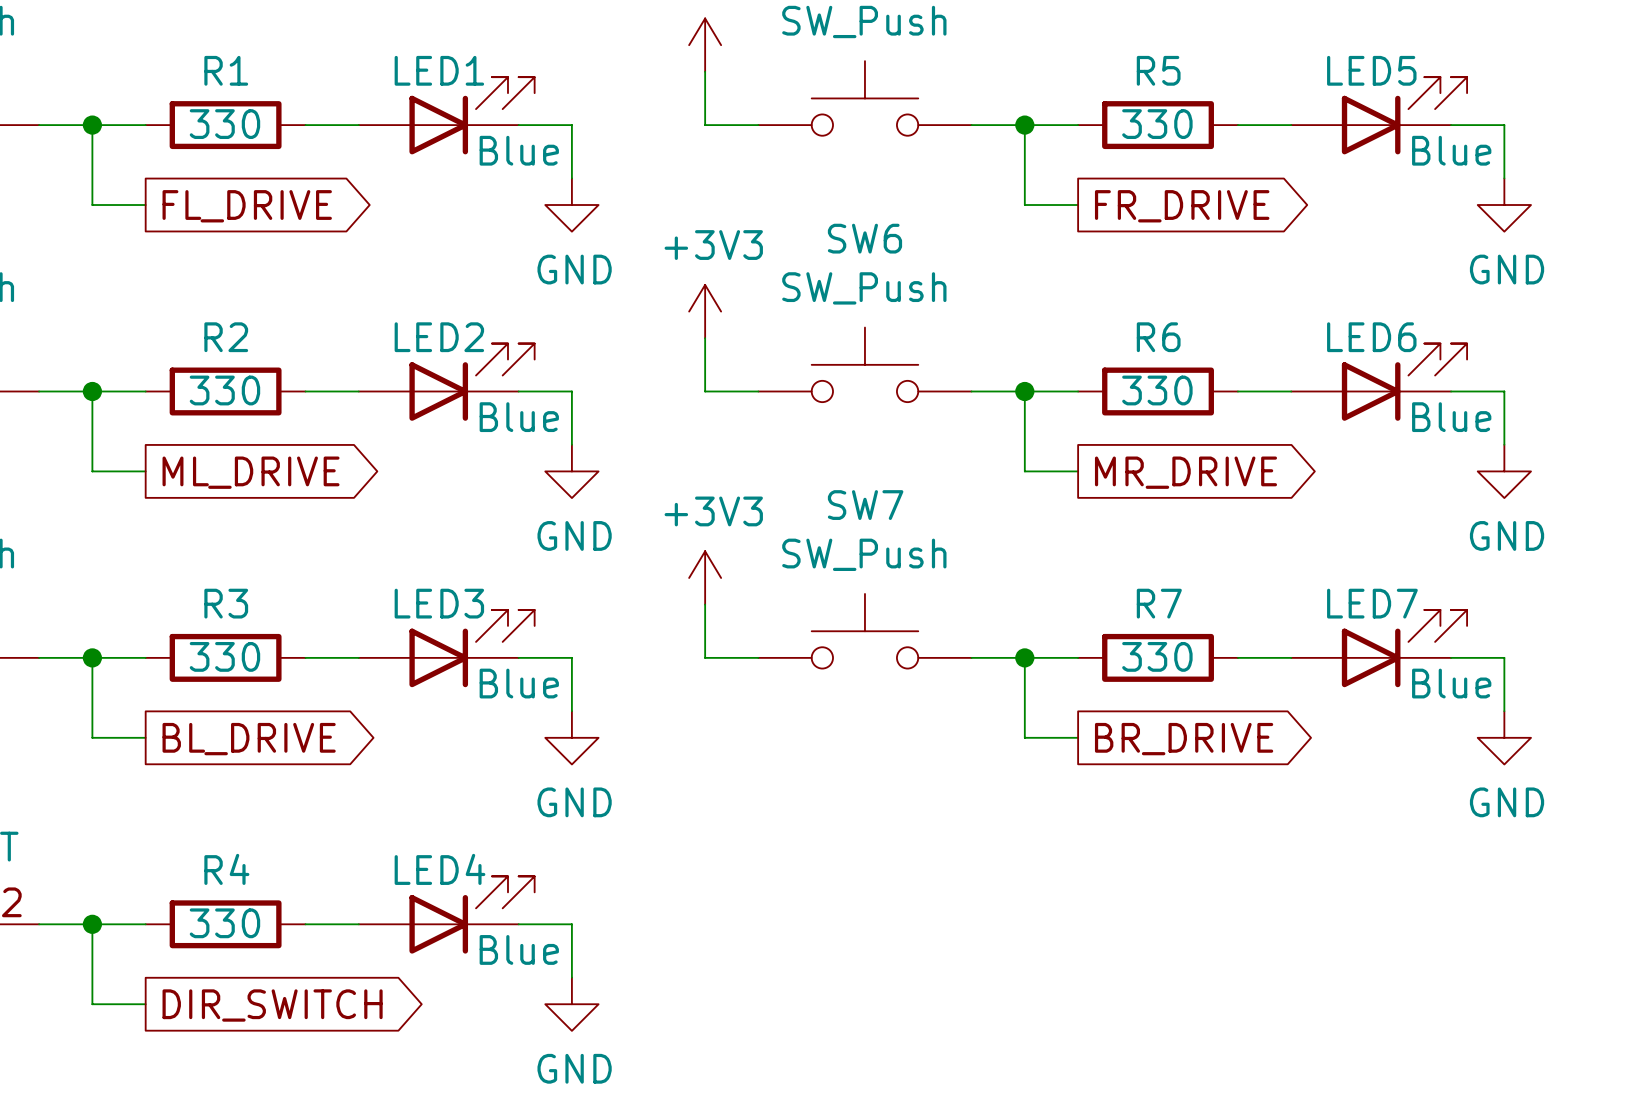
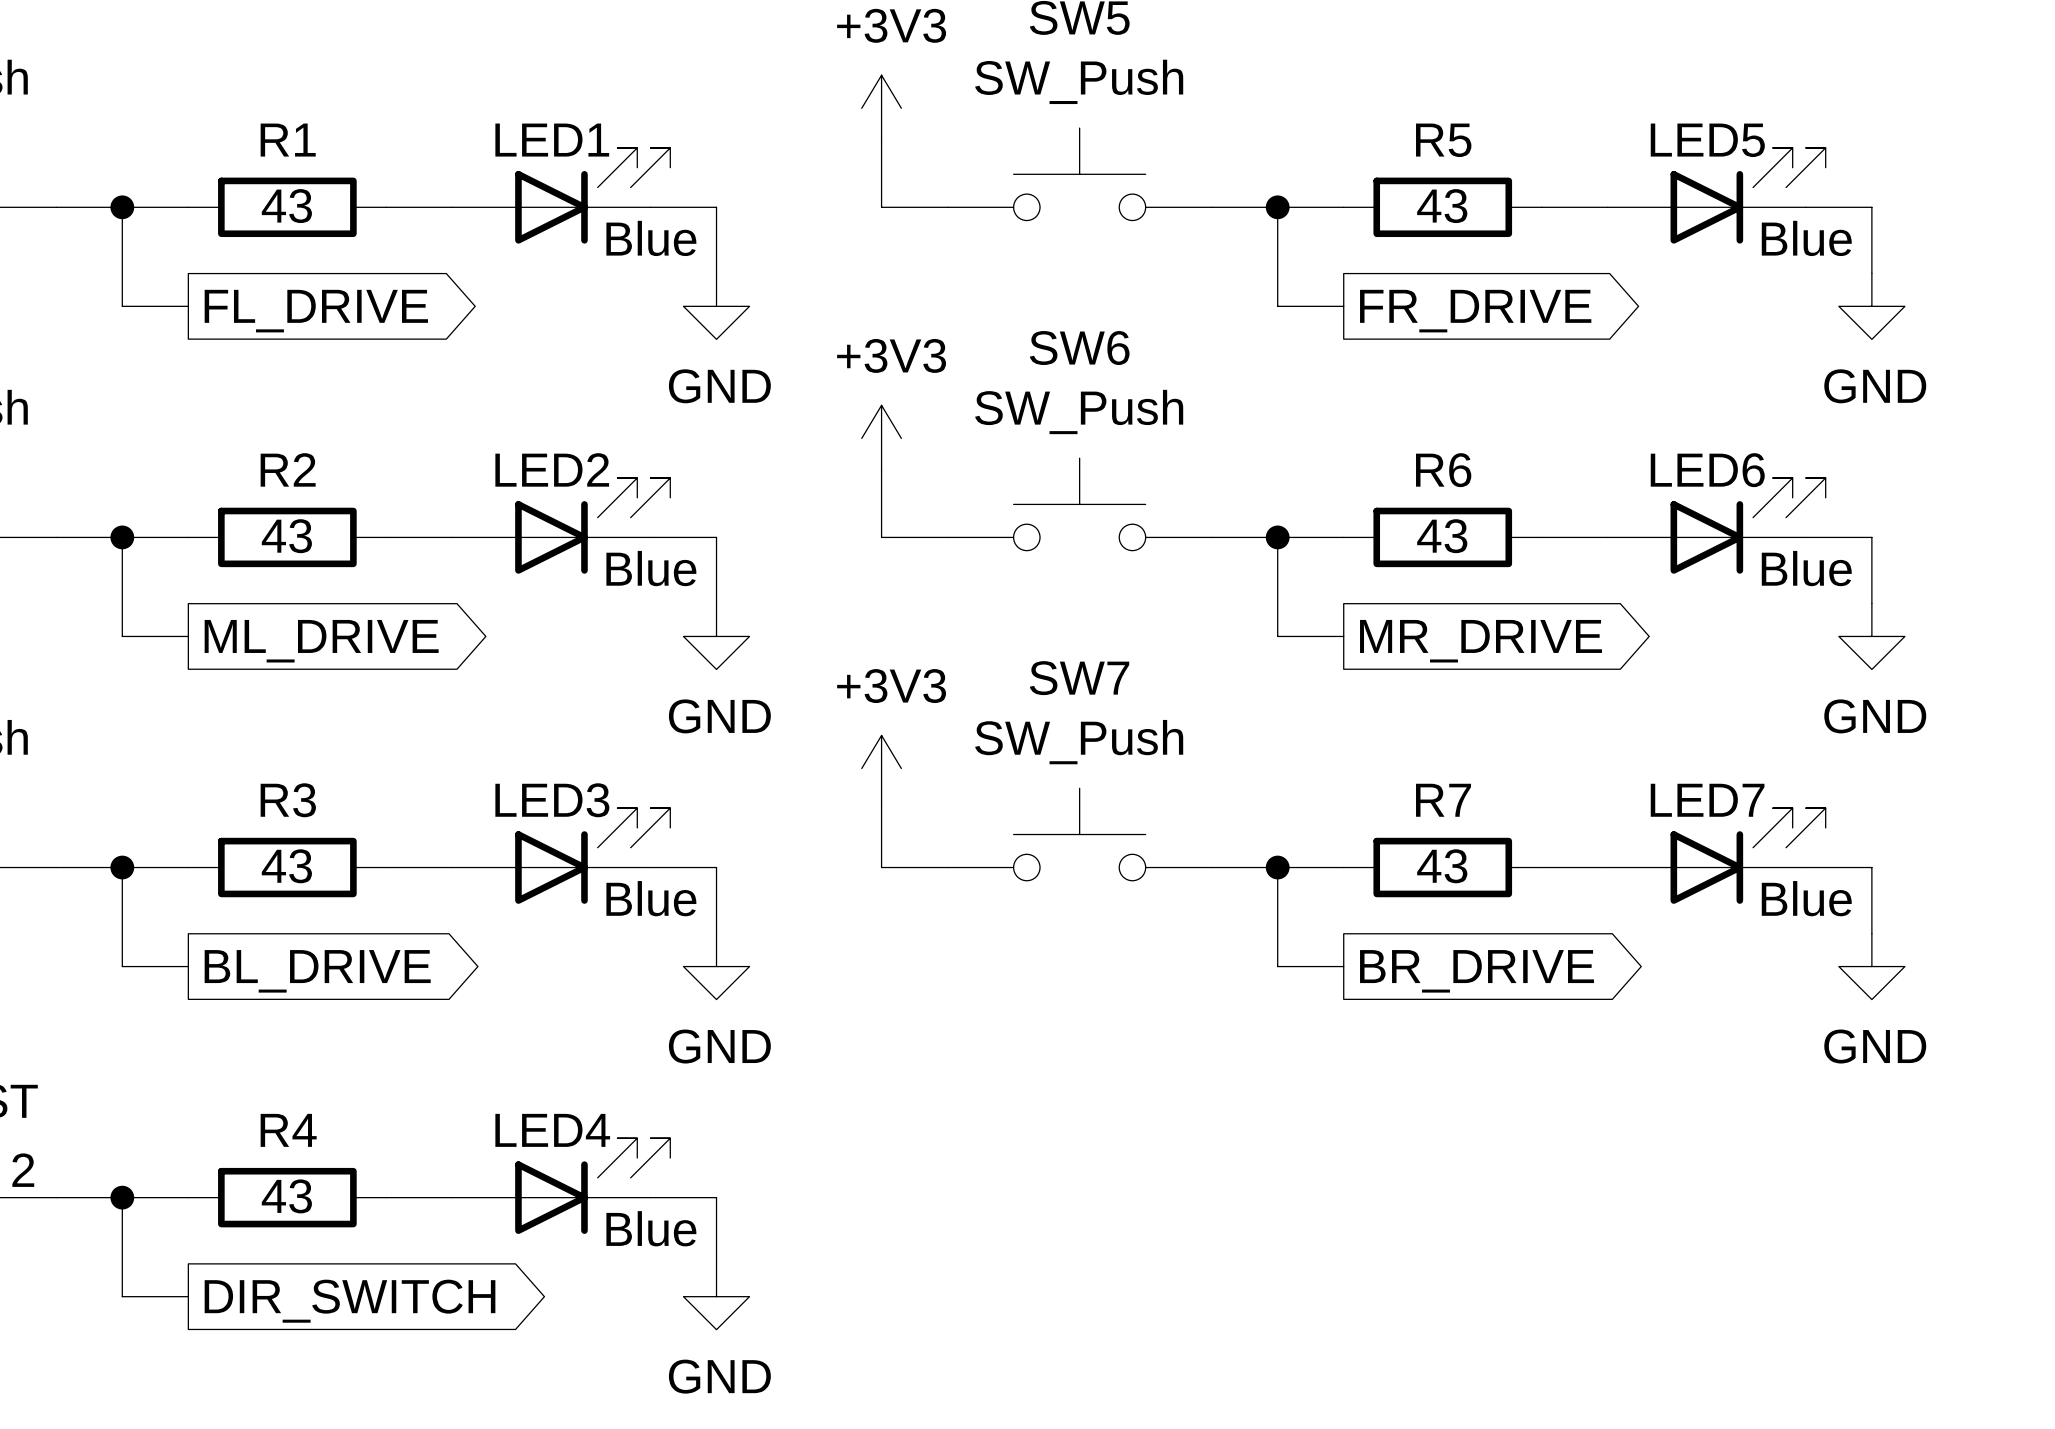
R1 value: 330 (224, 124) -> 43 (286, 206)
R5 value: 330 (1157, 124) -> 43 (1442, 206)
R2 value: 330 (224, 390) -> 43 (286, 536)
R6 value: 330 (1157, 390) -> 43 (1442, 536)
R3 value: 330 (224, 656) -> 43 (286, 866)
R7 value: 330 (1157, 656) -> 43 (1442, 866)
R4 value: 330 (224, 923) -> 43 (286, 1196)

